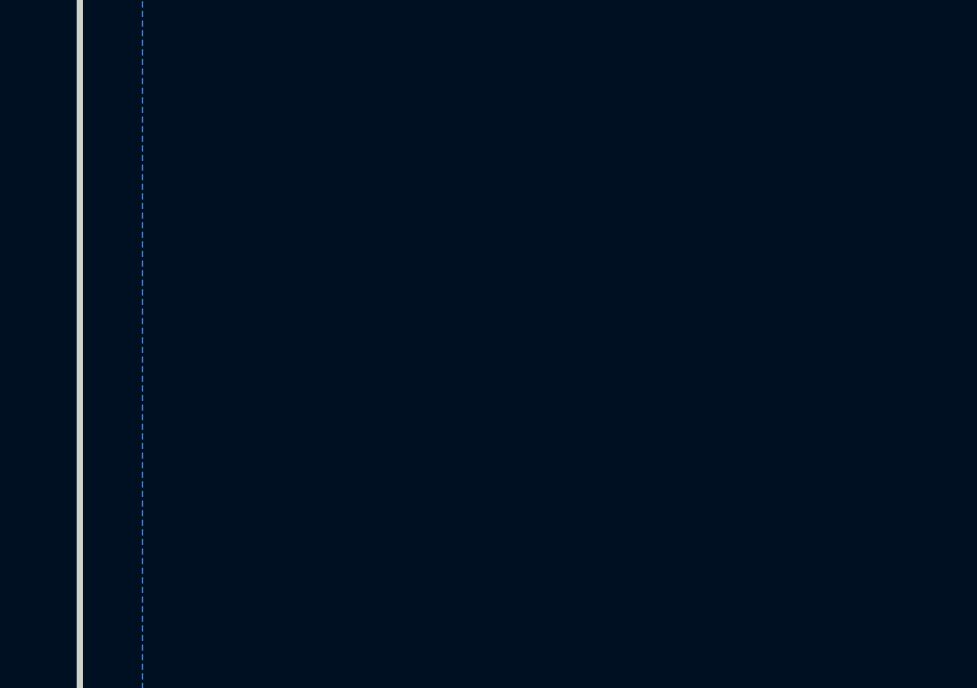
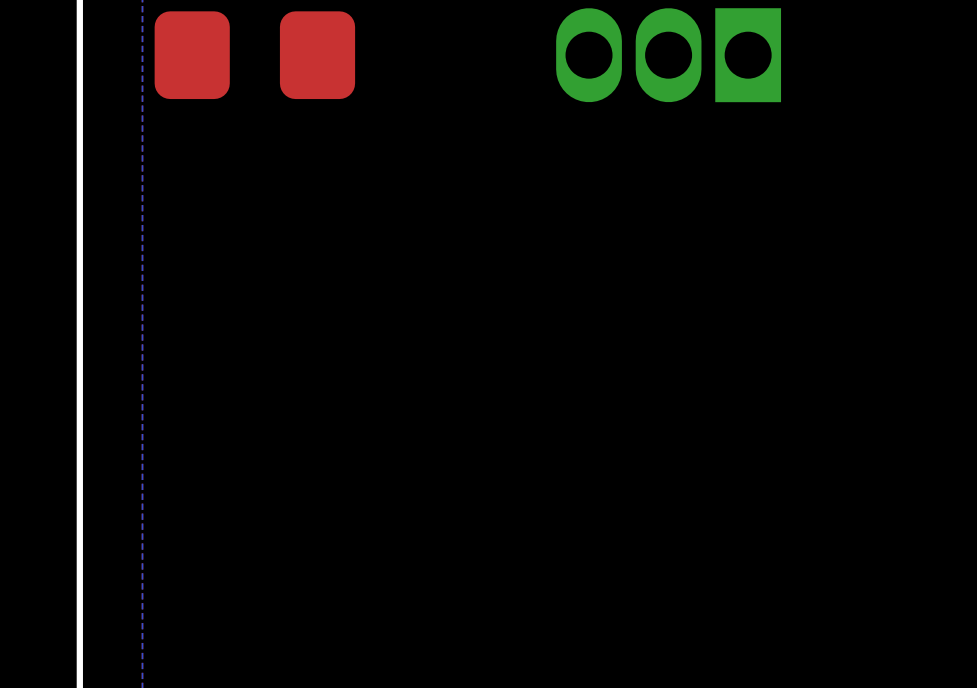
part: none -> (254, 55)
part: none -> (668, 55)

